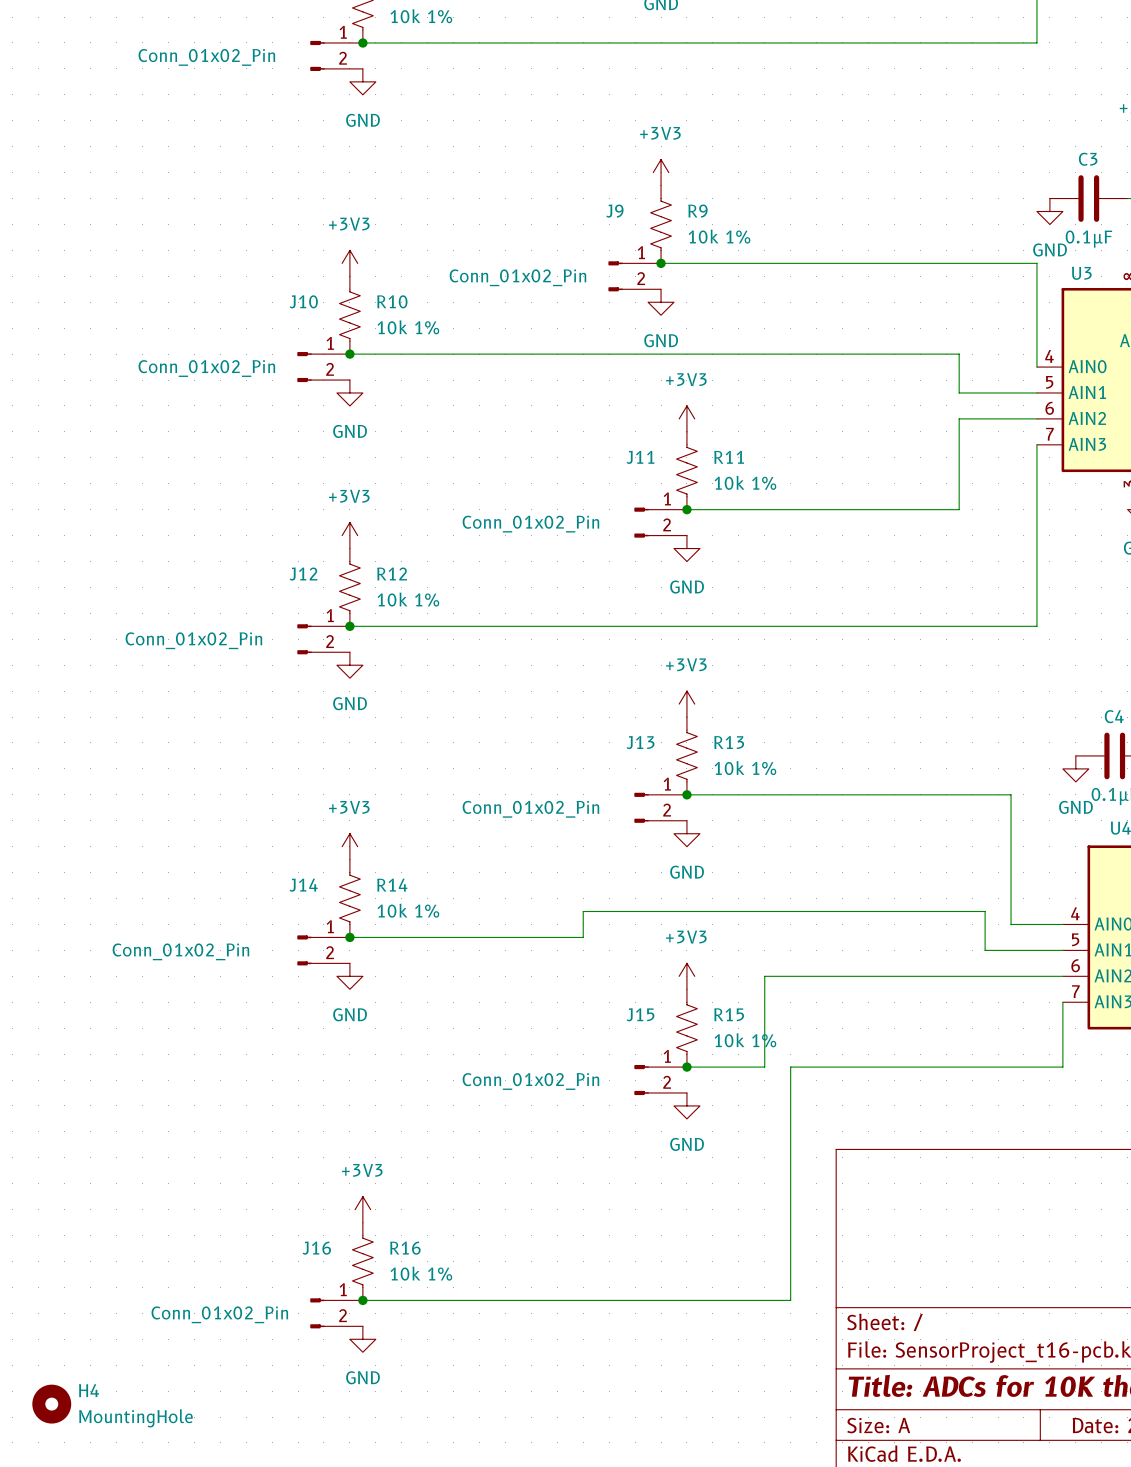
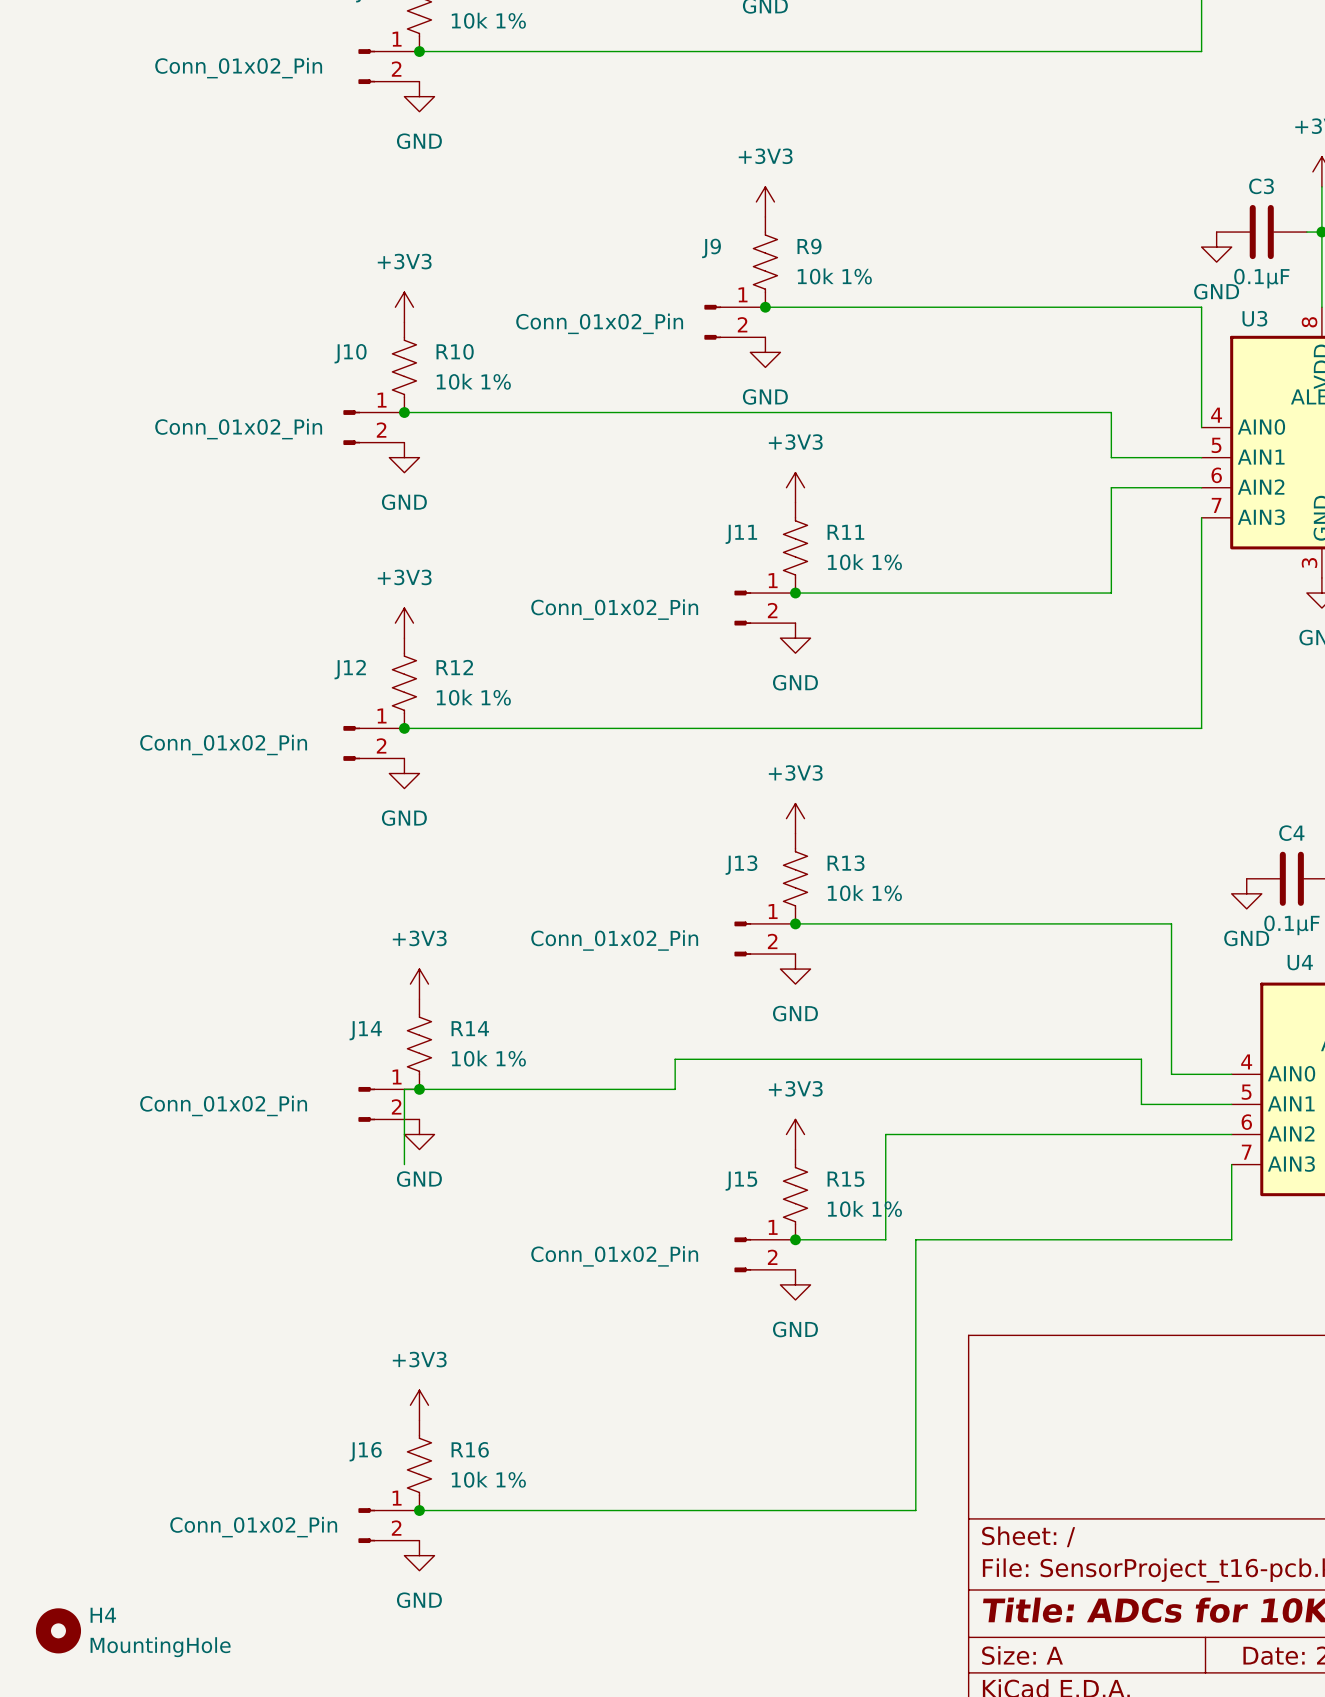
power symbol position: +3V3 (349, 846) -> +3V3 (419, 984)
R14 position: (349, 898) -> (419, 1044)
wire: none -> (404, 1089) (404, 1164)
junction position: (349, 937) -> (419, 1089)
J14 position: (323, 950) -> (388, 1104)
power symbol position: GND (349, 976) -> GND (419, 1134)

